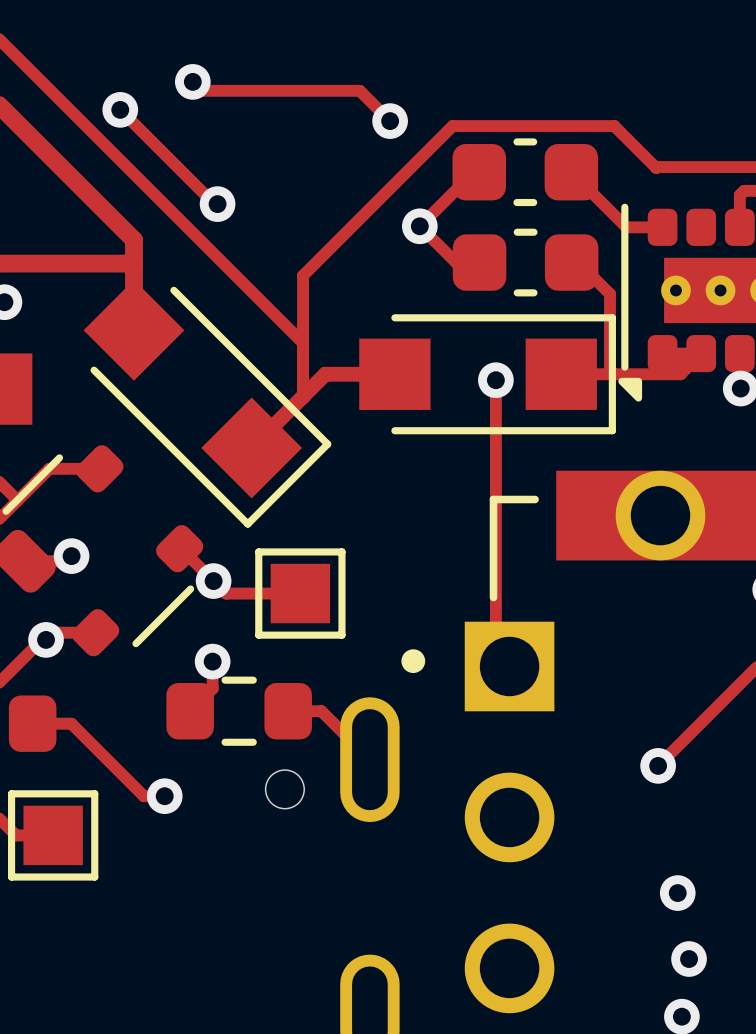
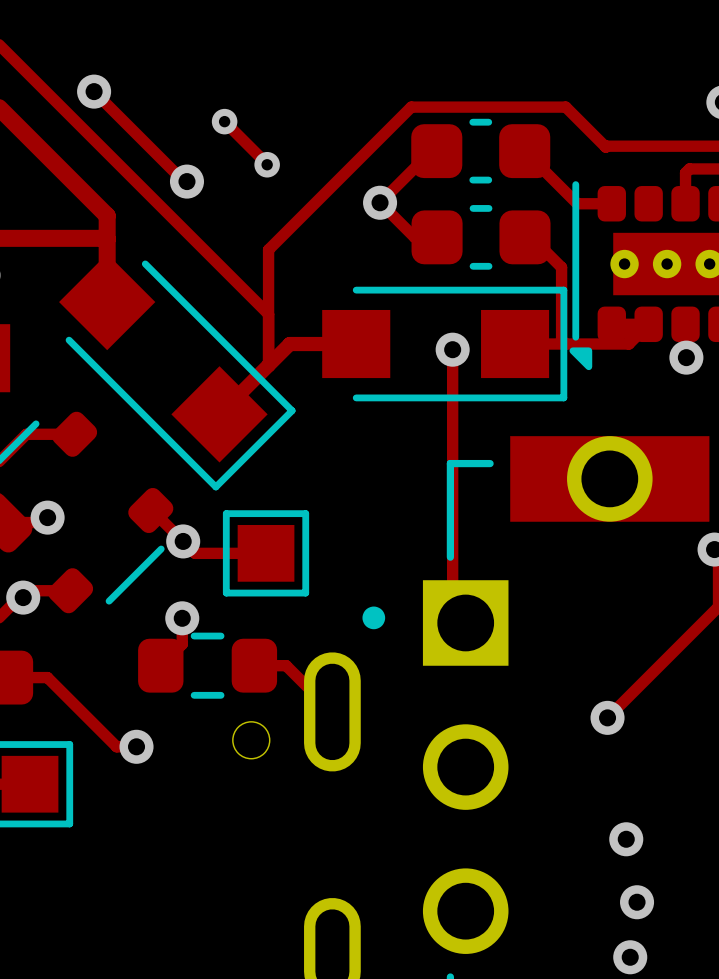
track: (192, 81) (201, 90) (359, 90) (390, 121) -> none
via: (192, 81) -> none
via: (390, 121) -> none
track: none -> (224, 121) (267, 164)
via: none -> (224, 121)
via: none -> (267, 164)

